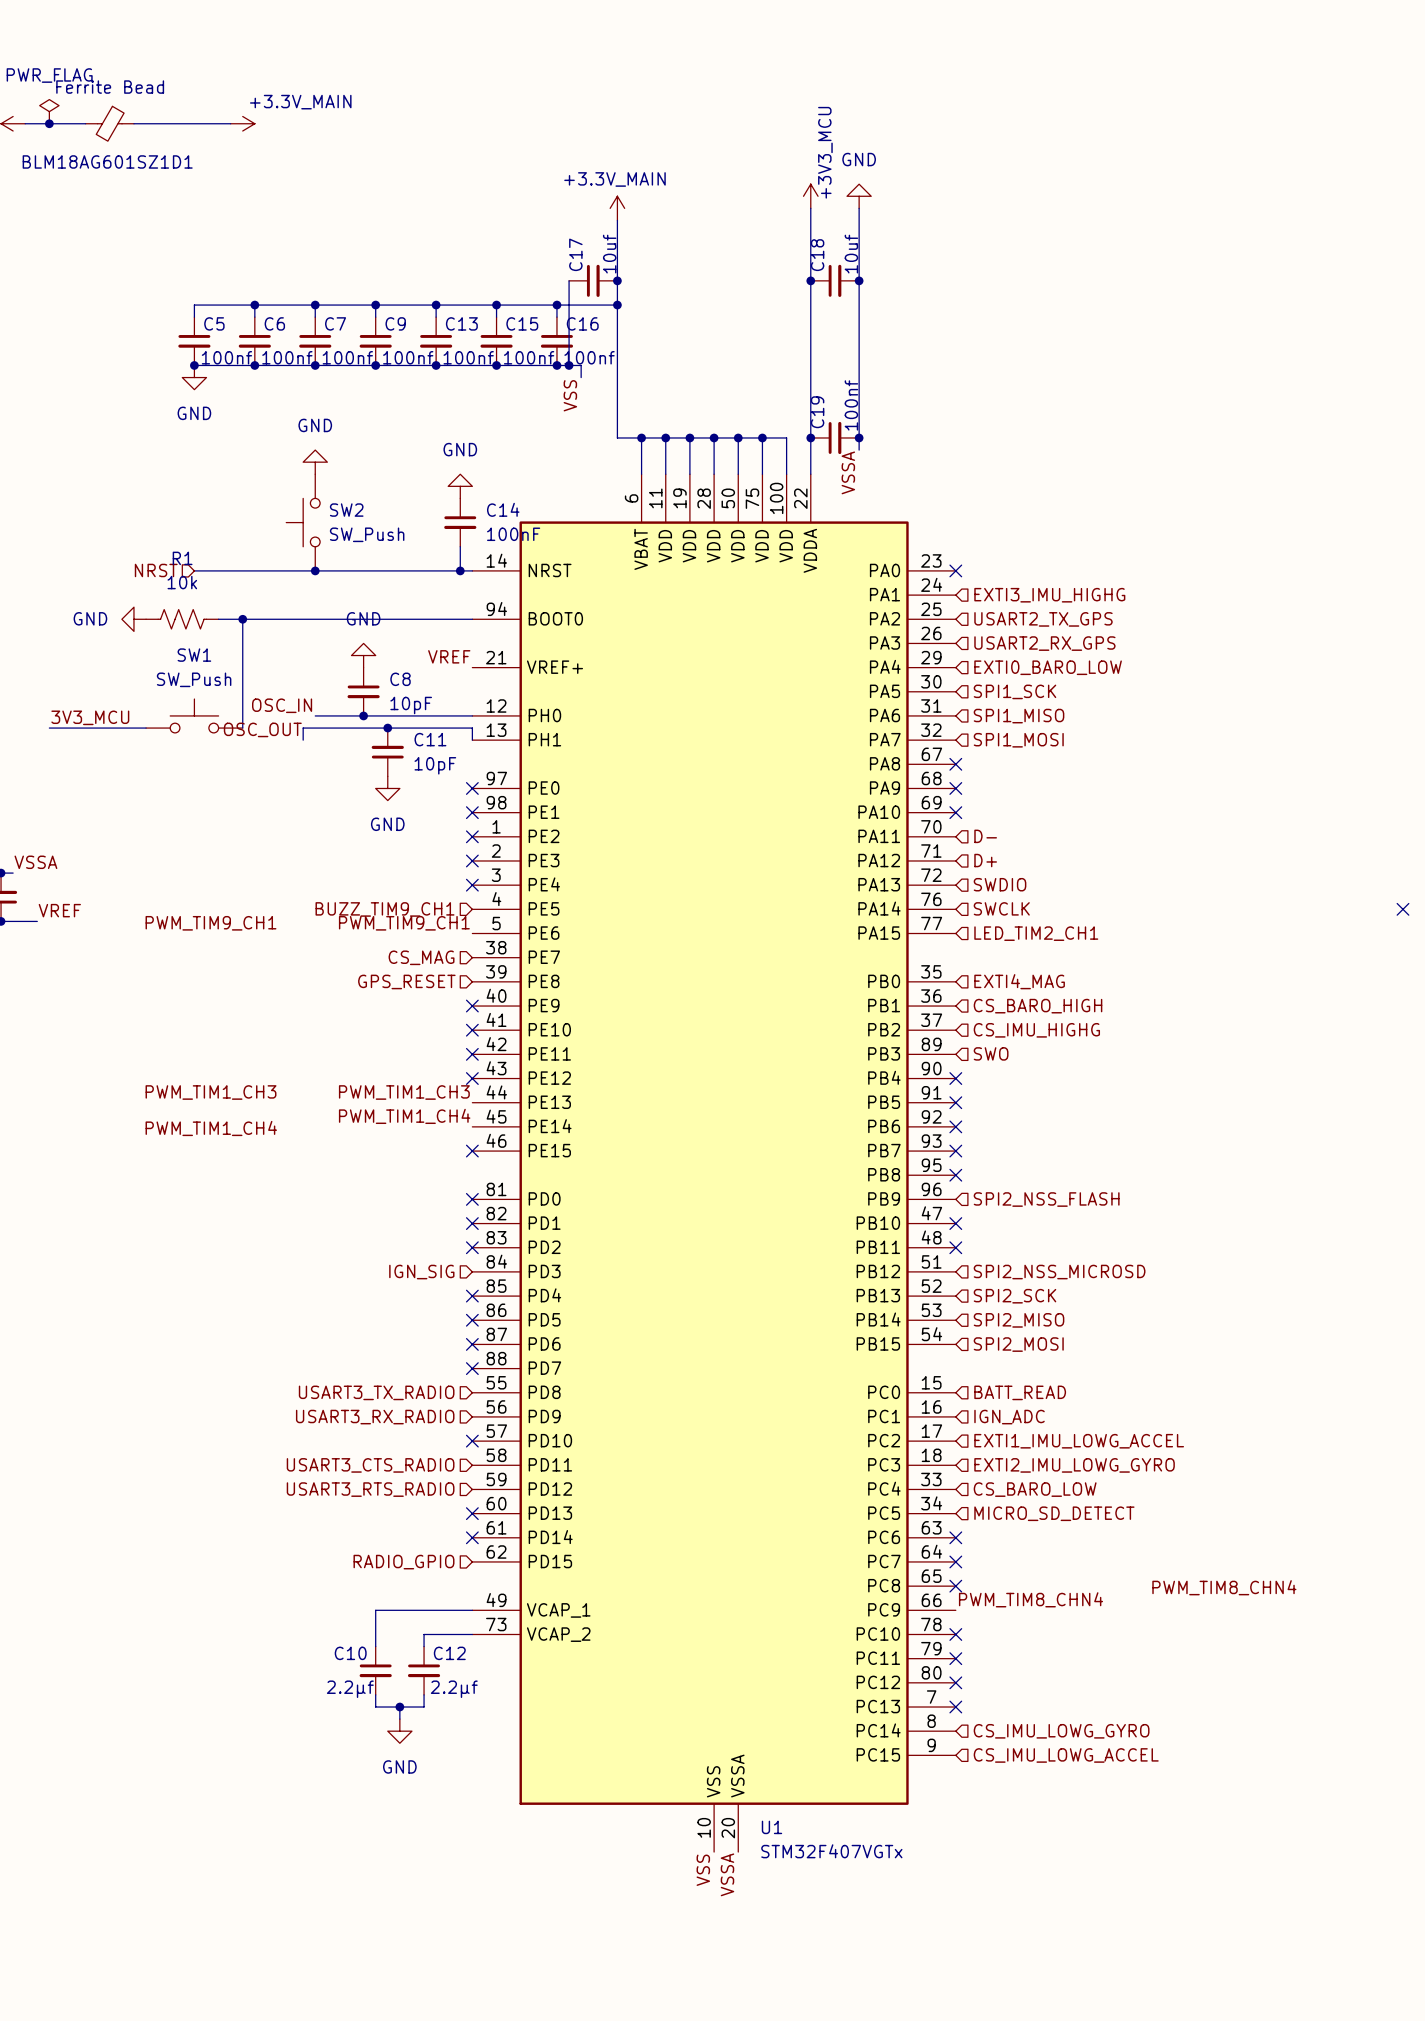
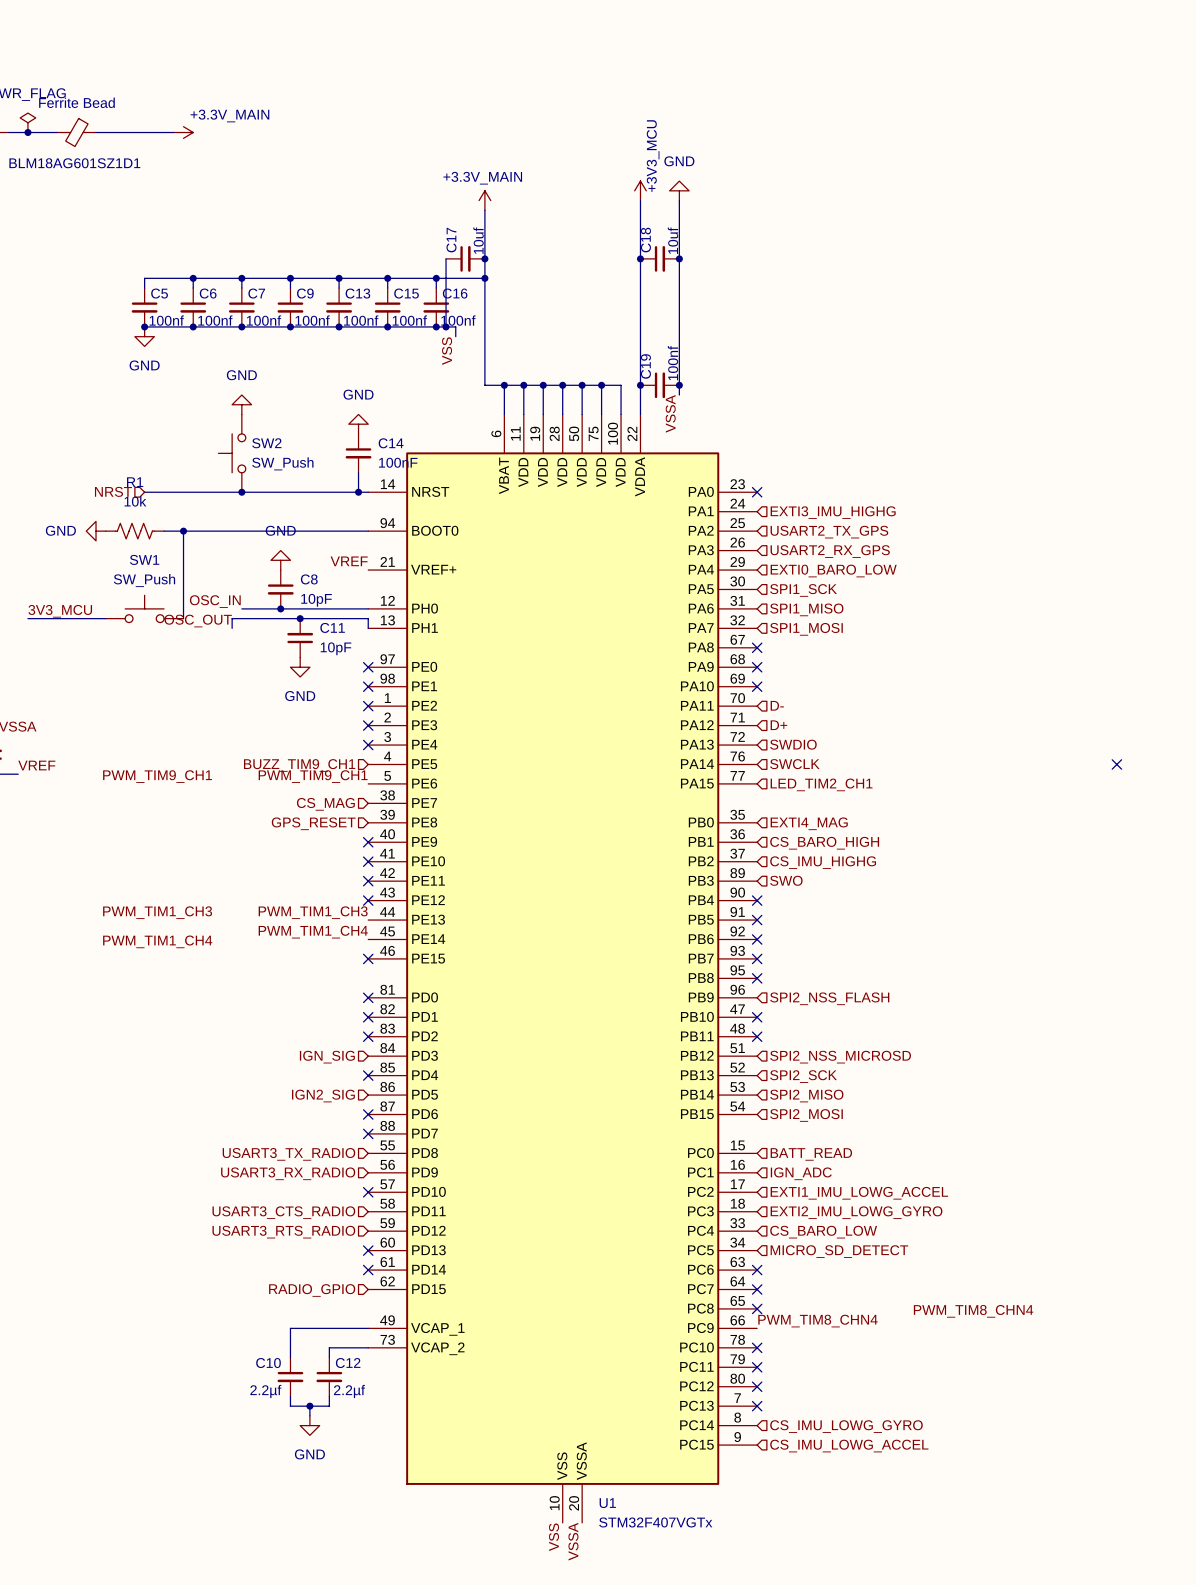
hierarchical label: none -> IGN2_SIG (323, 1096)
no-connect mark: (472, 1320) -> none

